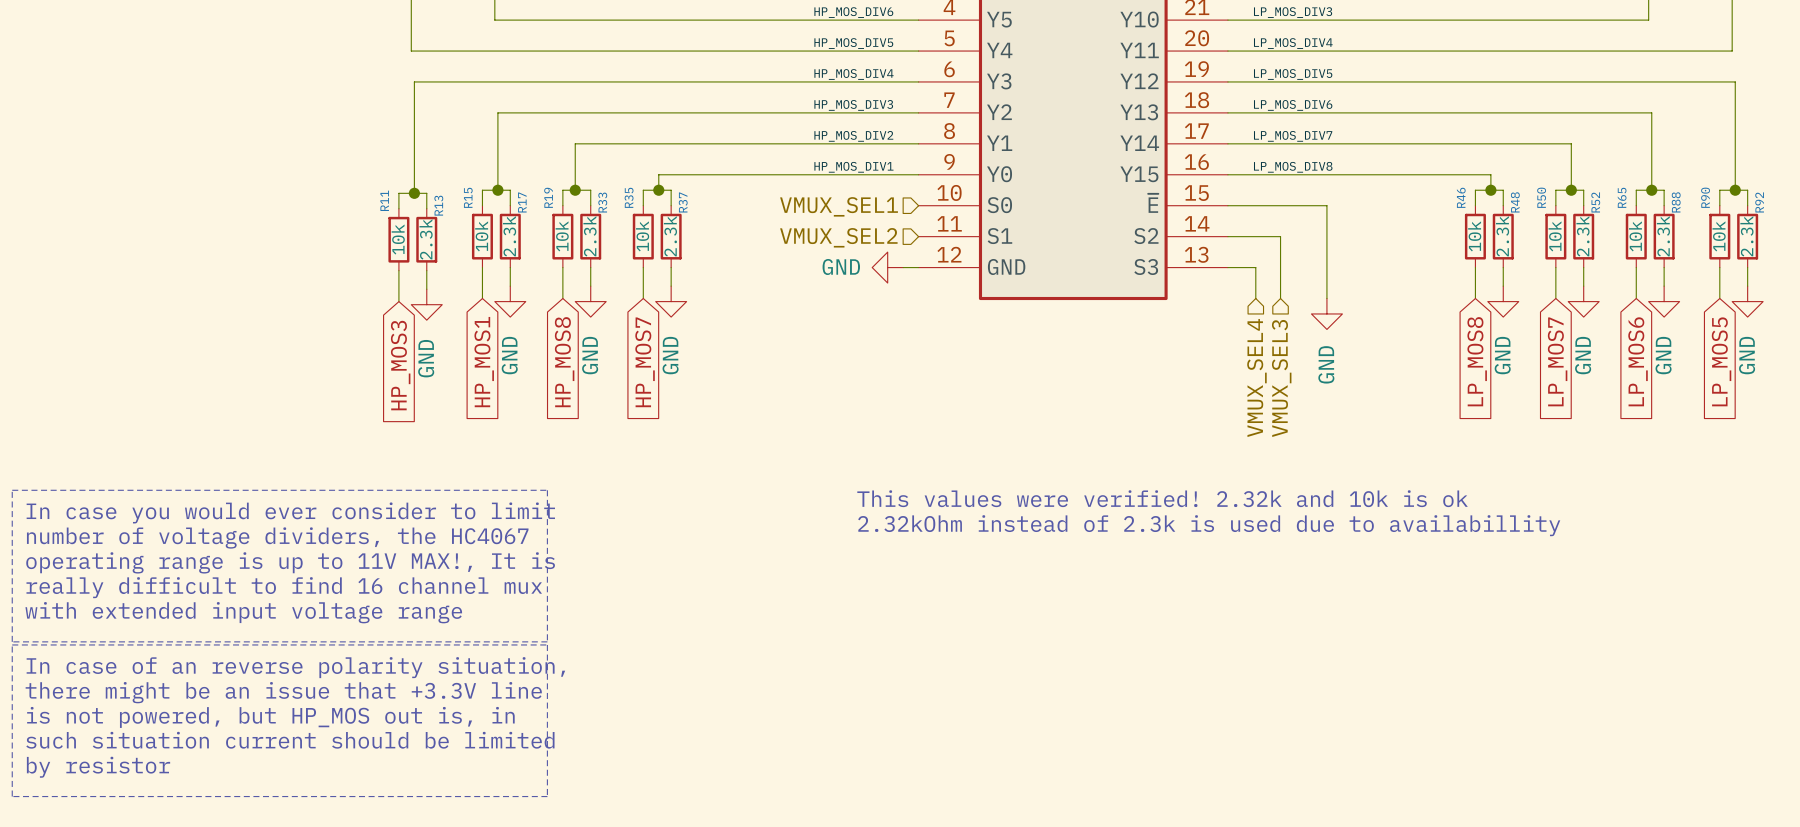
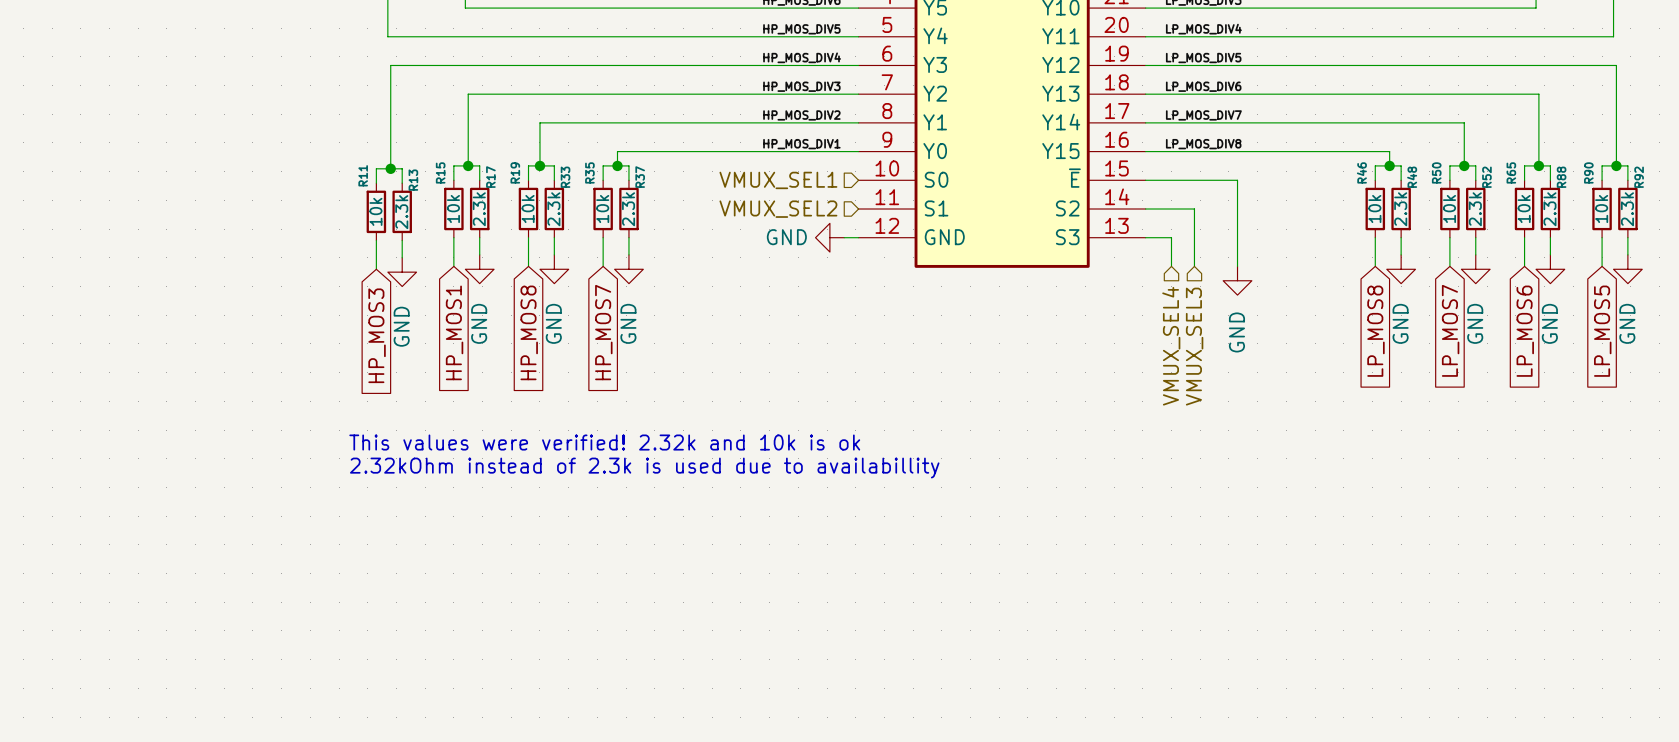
text: none -> This values were verified! 2.32k and 10k is ok (604, 442)
line: (12, 490) (547, 490) (547, 641) (12, 641) (12, 490) -> none
text: This values were verified! 2.32k and 10k is ok (1162, 498) -> none
text: In case you would ever consider to limit (290, 512) -> none
text: none -> 2.32kOhm instead of 2.3k is used due to availabillity (644, 468)
text: 2.32kOhm instead of 2.3k is used due to availabillity (1209, 525) -> none
text: number of voltage dividers, the HC4067 (277, 537) -> none
text: operating range is up to 11V MAX!, It is (290, 562) -> none
text: really difficult to find 16 channel mux (284, 587) -> none
text: with extended input voltage range (243, 612) -> none
line: (12, 644) (12, 796) (547, 796) (547, 644) (12, 644) -> none
text: In case of an reverse polarity situation, (295, 667) -> none
text: there might be an issue that +3.3V line (283, 692) -> none
text: is not powered, but HP_MOS out is, in (270, 717) -> none
text: such situation current should be limited (290, 740) -> none
text: by resistor (98, 767) -> none

